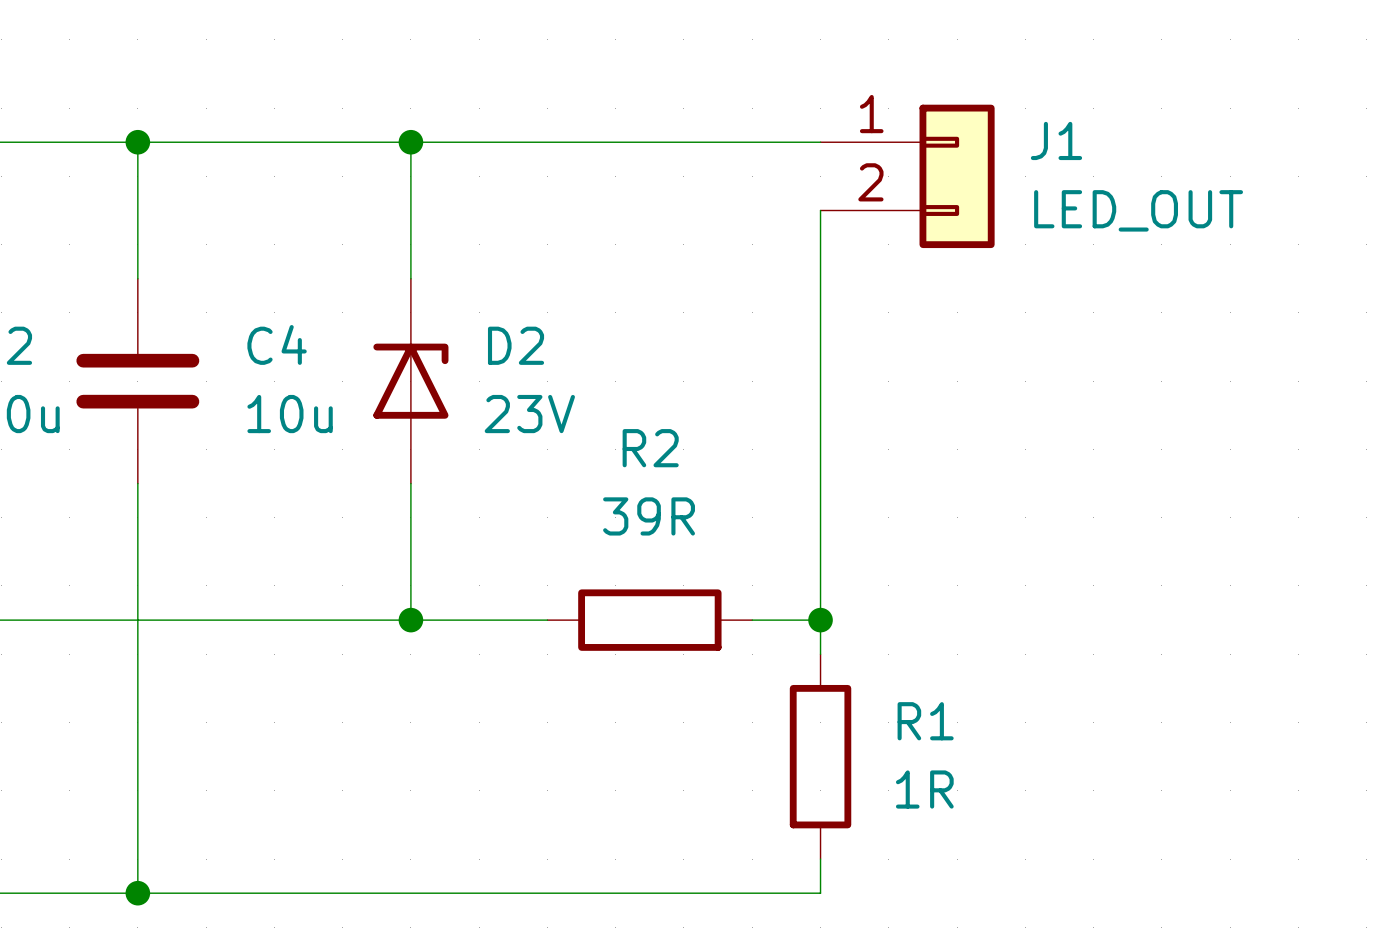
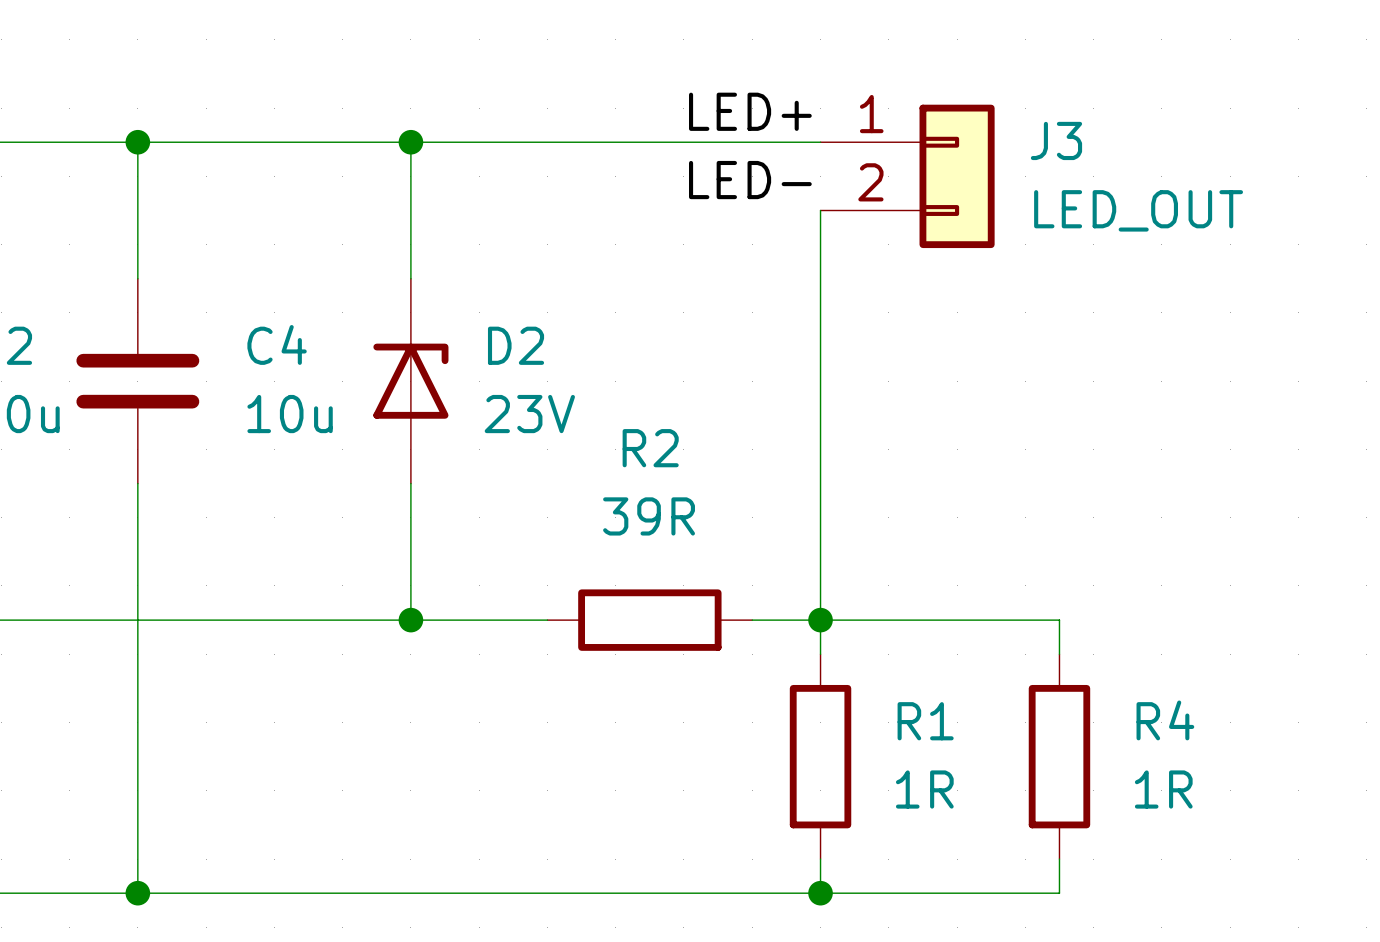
label: none -> LED+ (750, 111)
J1 name: J1 (1056, 140) -> J3 (1056, 140)
label: none -> LED- (750, 180)
wire: none -> (820, 620) (1059, 620) (1059, 654)
R4: none -> 1R (1059, 756)
wire: none -> (1059, 859) (1059, 893) (820, 893)
junction: none -> (820, 893)

